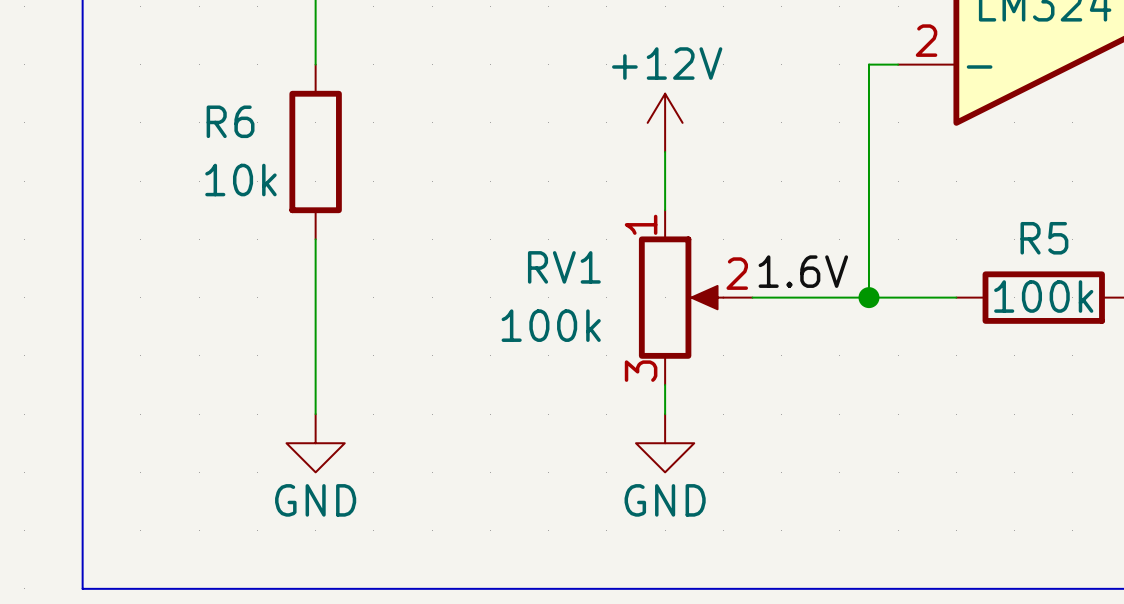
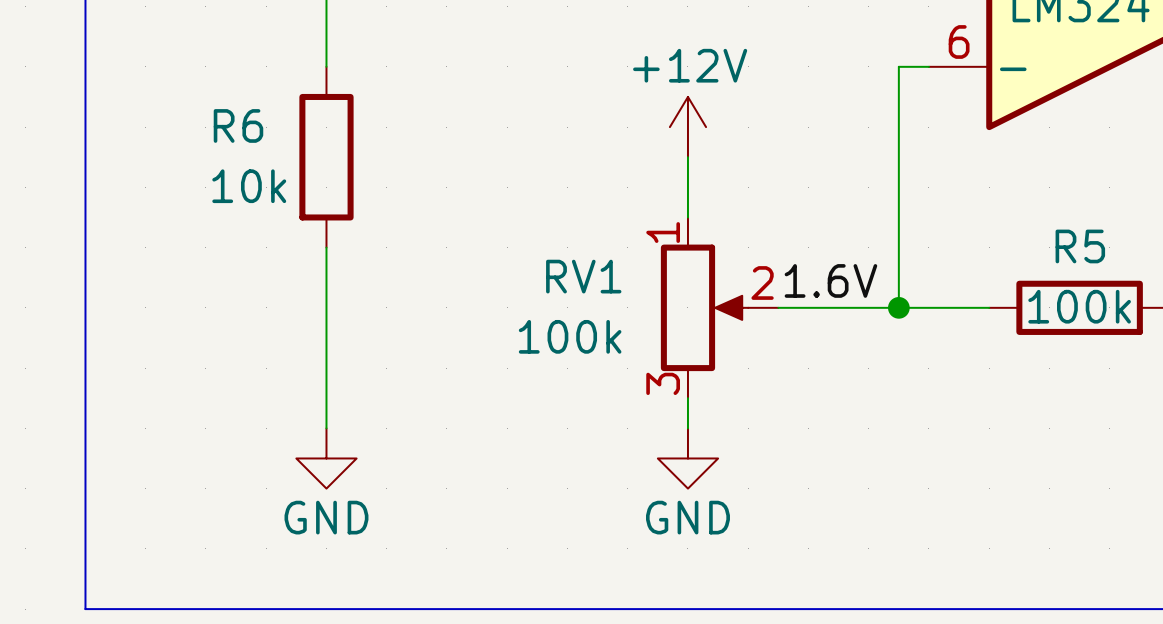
part pin number: 2 (926, 40) -> 6 (959, 41)

